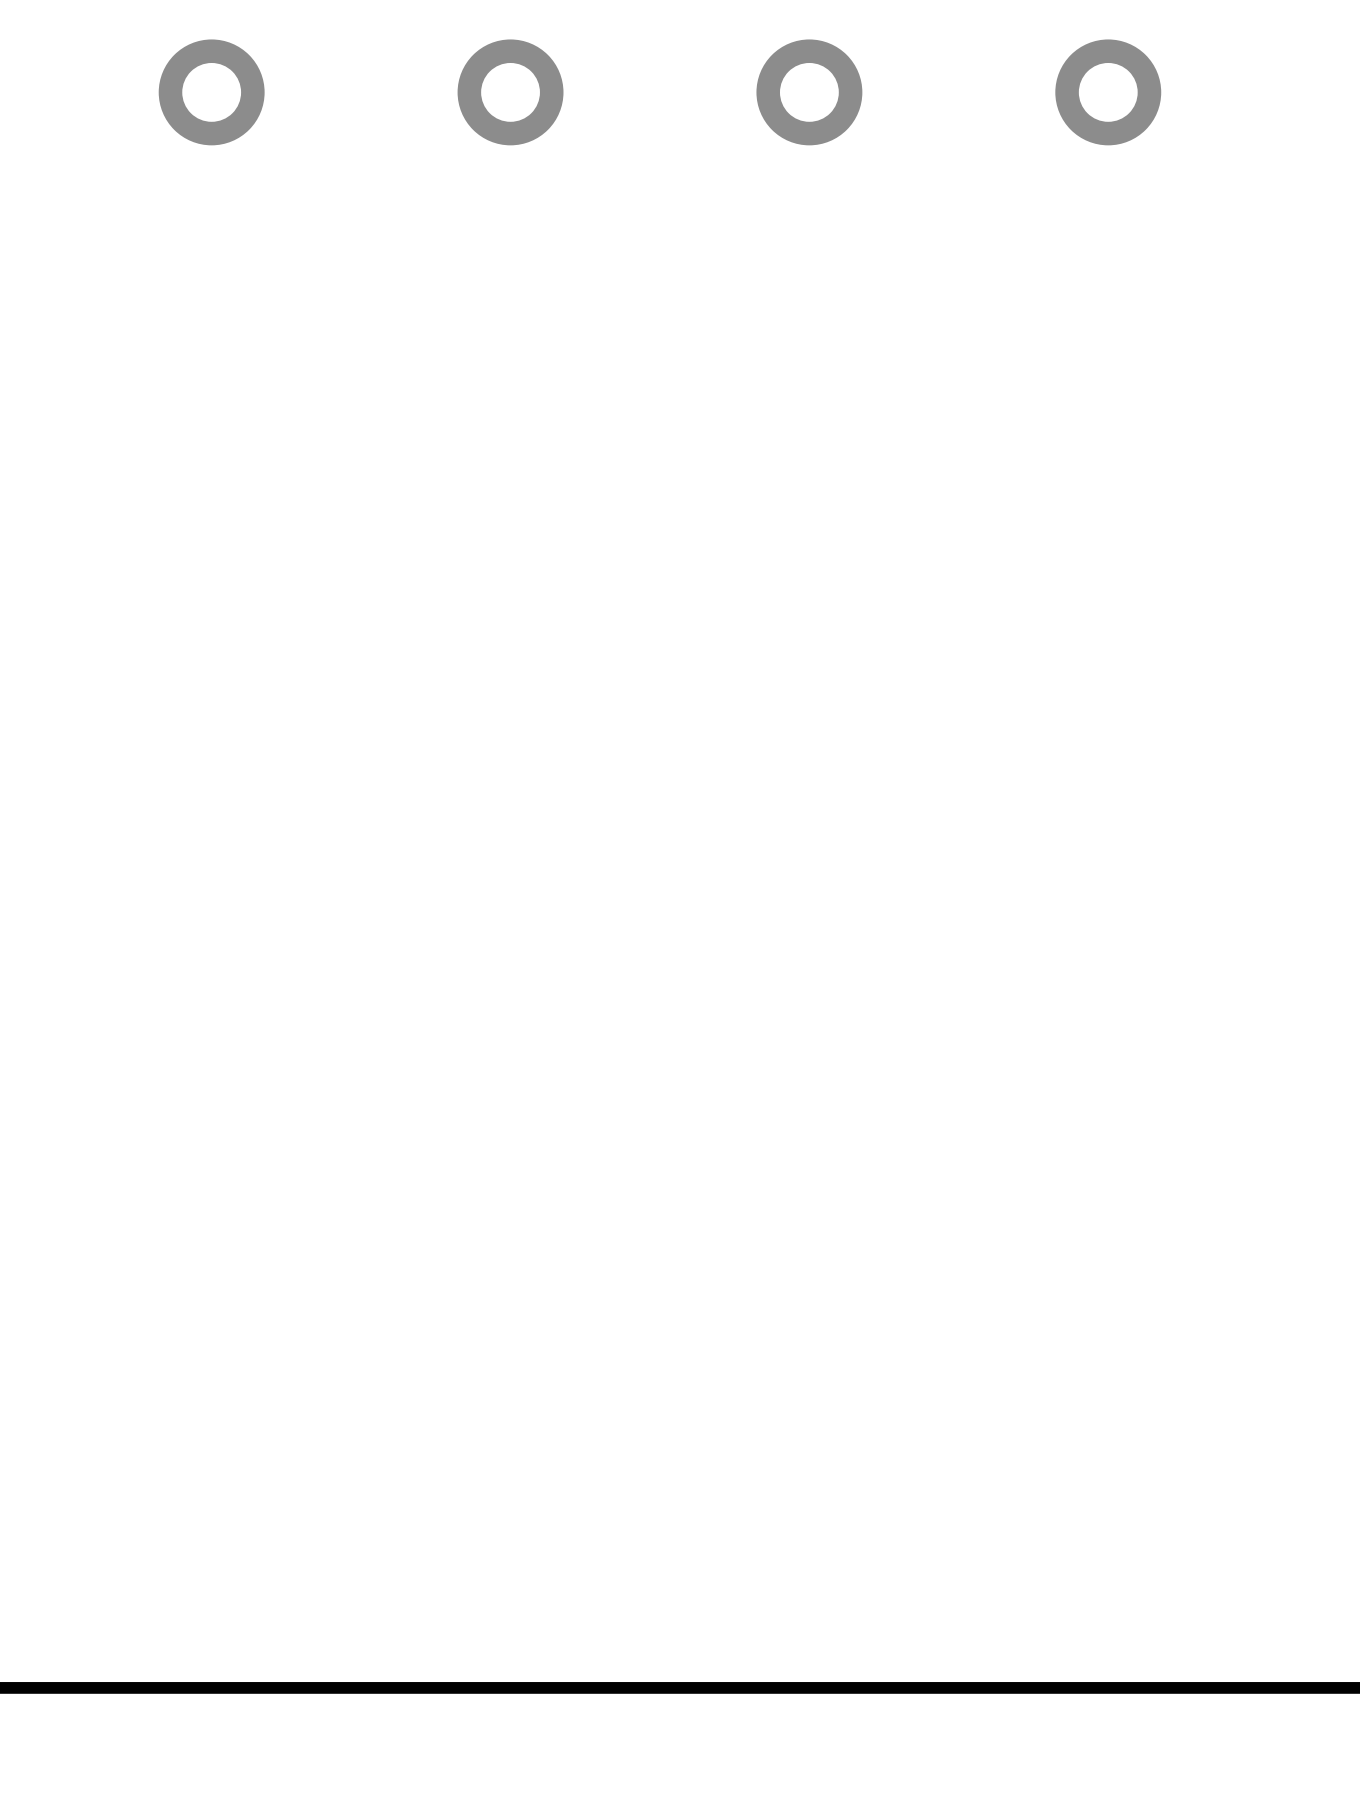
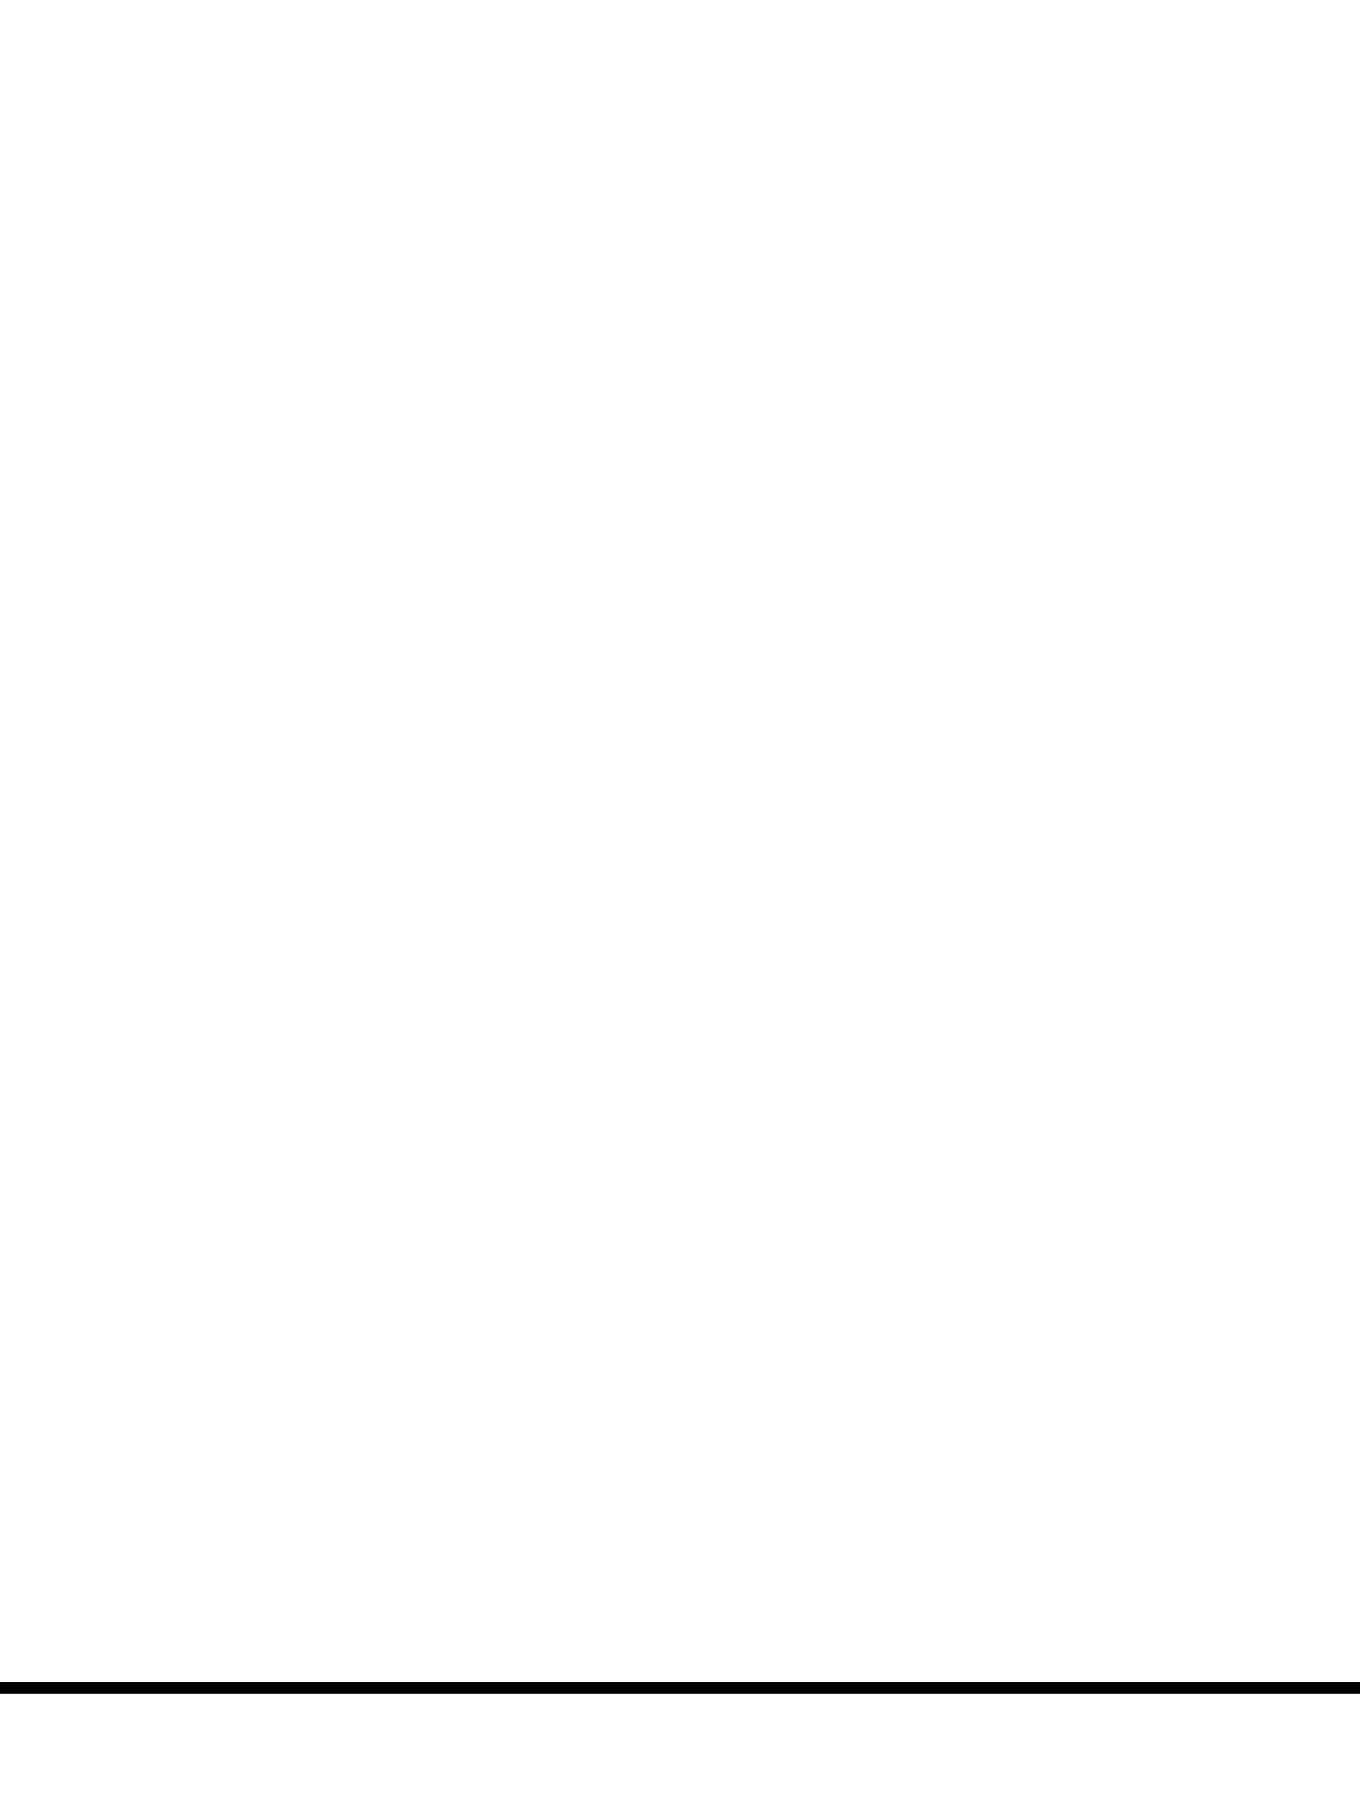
via: (211, 92) -> none
via: (510, 92) -> none
via: (809, 92) -> none
via: (1108, 92) -> none

